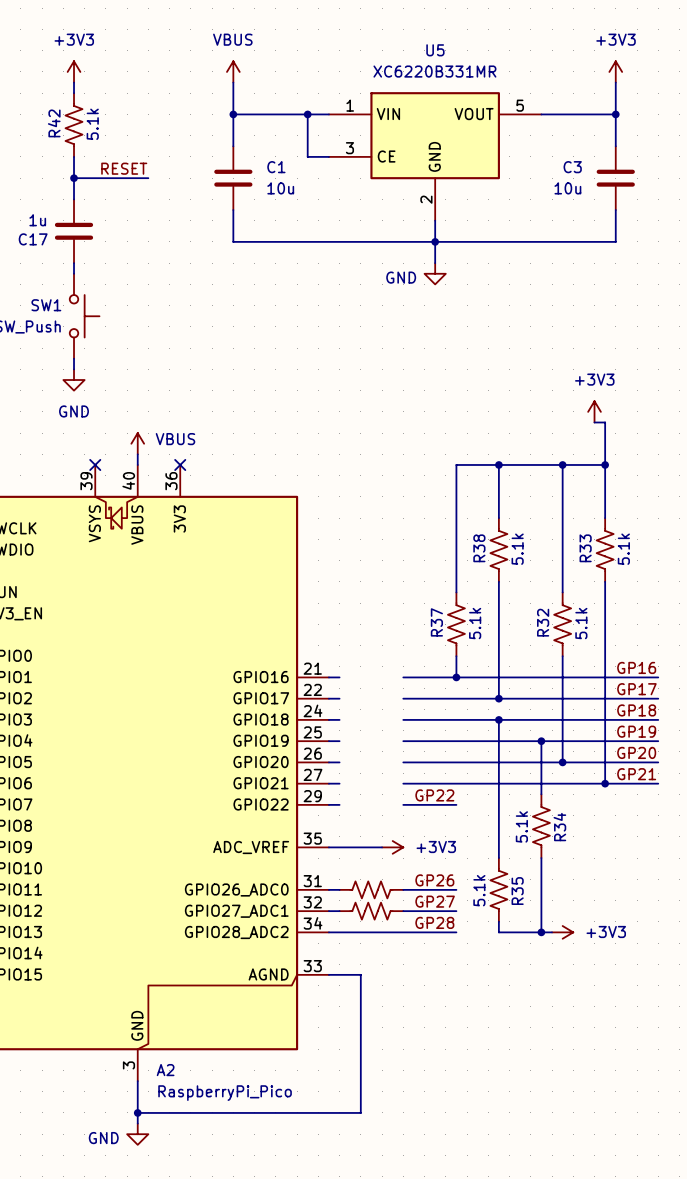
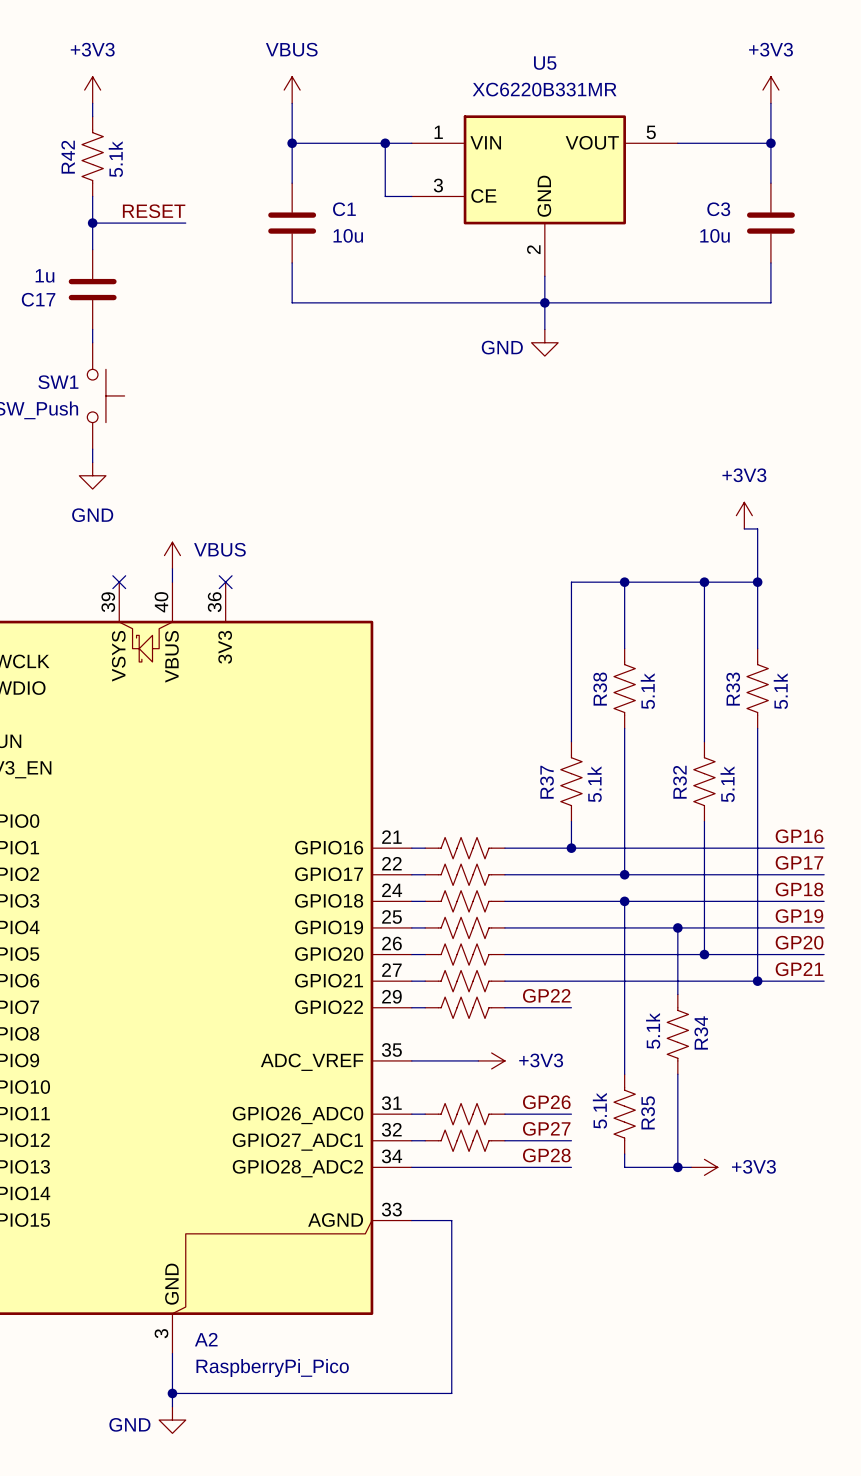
part: none -> (465, 848)
part: none -> (465, 874)
part: none -> (465, 901)
part: none -> (465, 927)
part: none -> (465, 954)
part: none -> (465, 981)
part: none -> (465, 1007)

